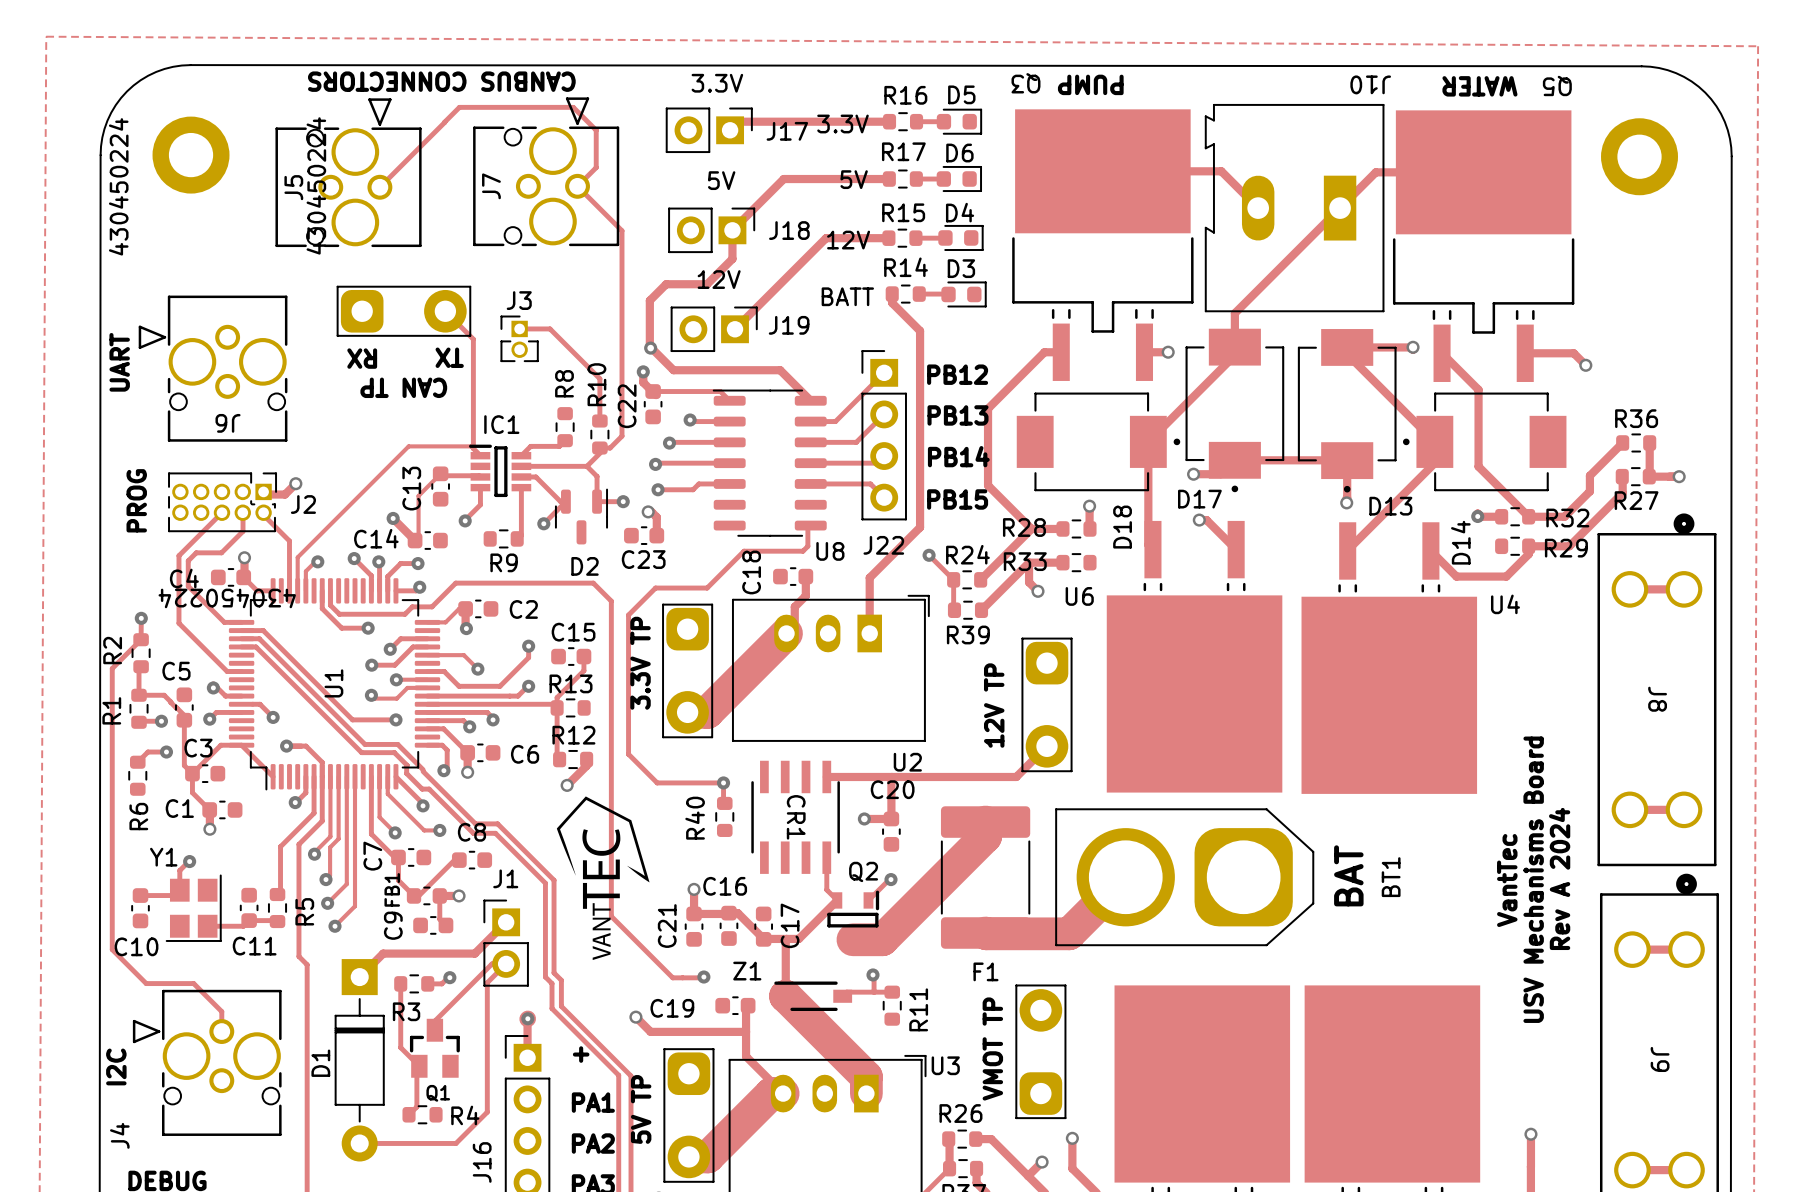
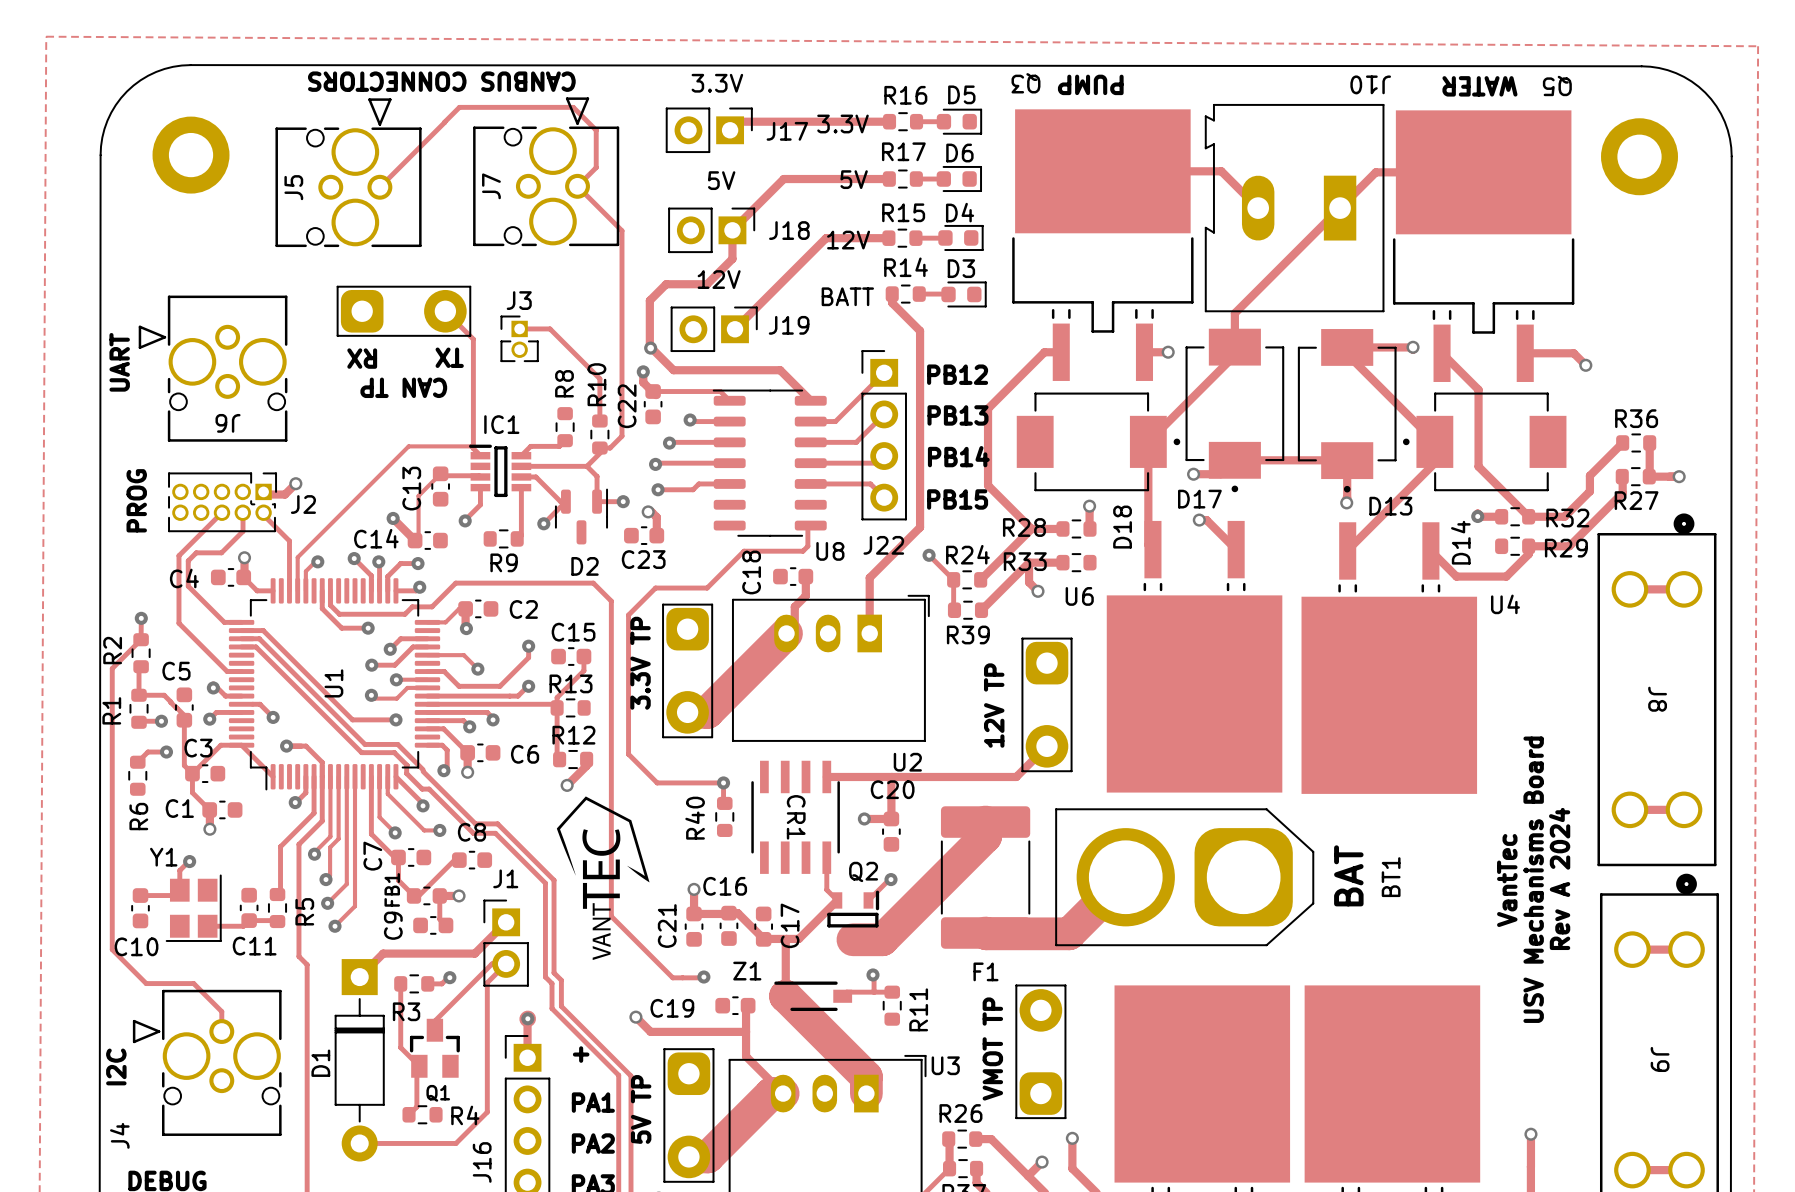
J7 text: 430450224 (316, 185) -> none
J5 text: 430450224 (118, 186) -> none
J6 text: 430450224 (227, 598) -> none

